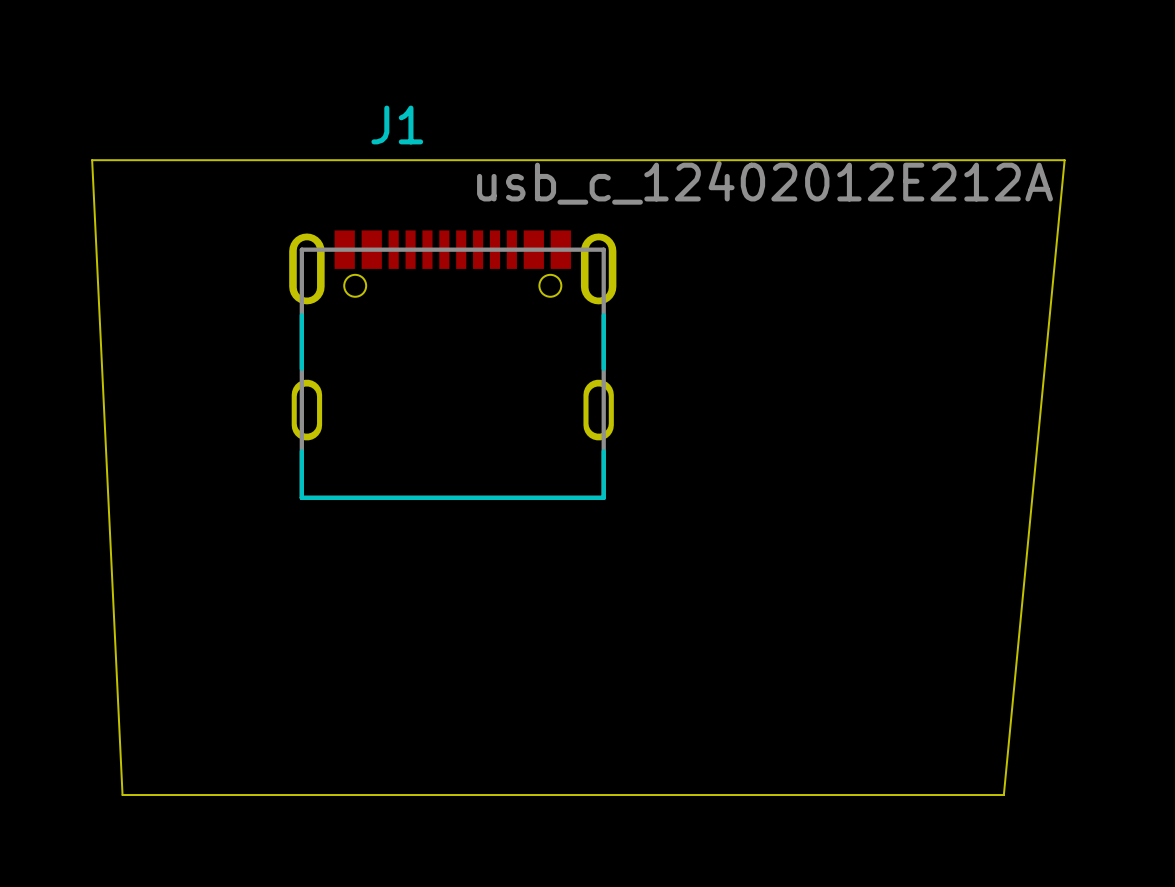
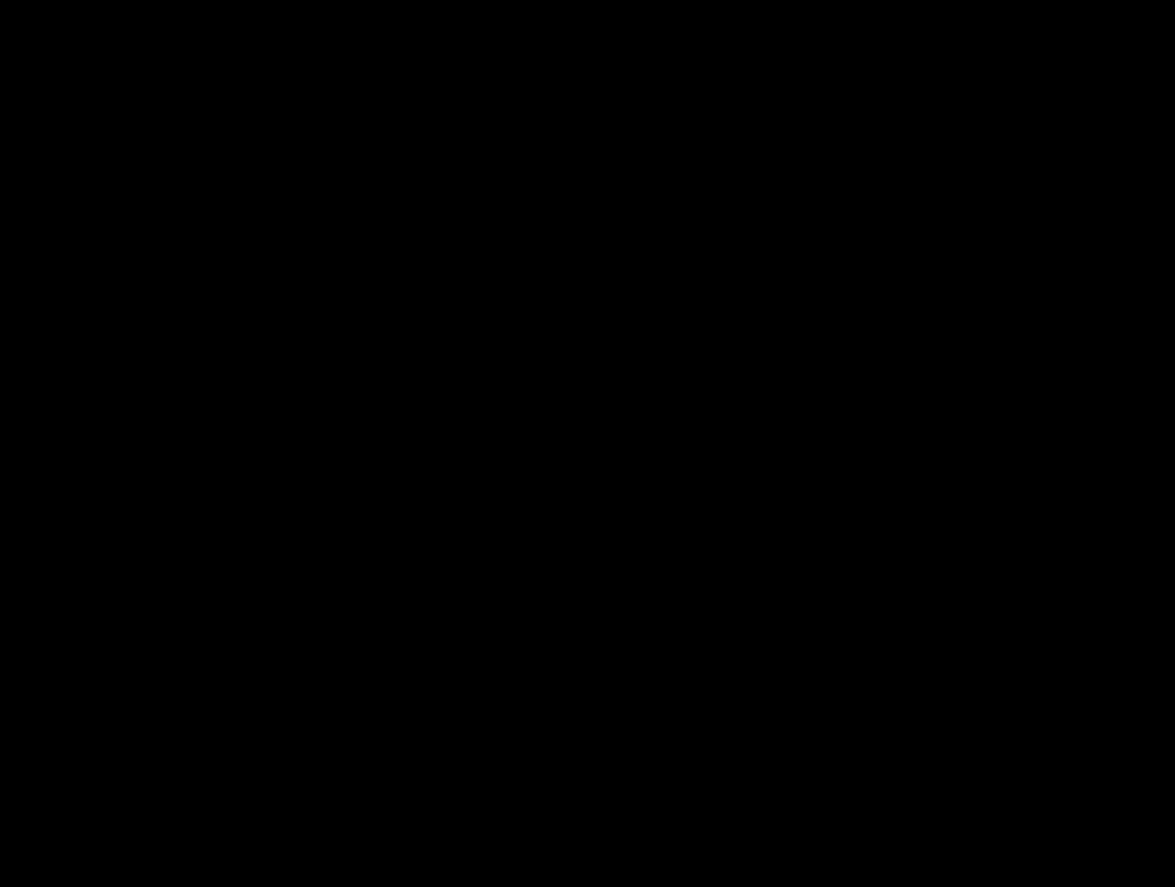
board edge: (92, 160) (122, 795) (1003, 795) (1064, 160) (92, 160) -> none
J1: usb_c_12402012E212A (452, 365) -> none

